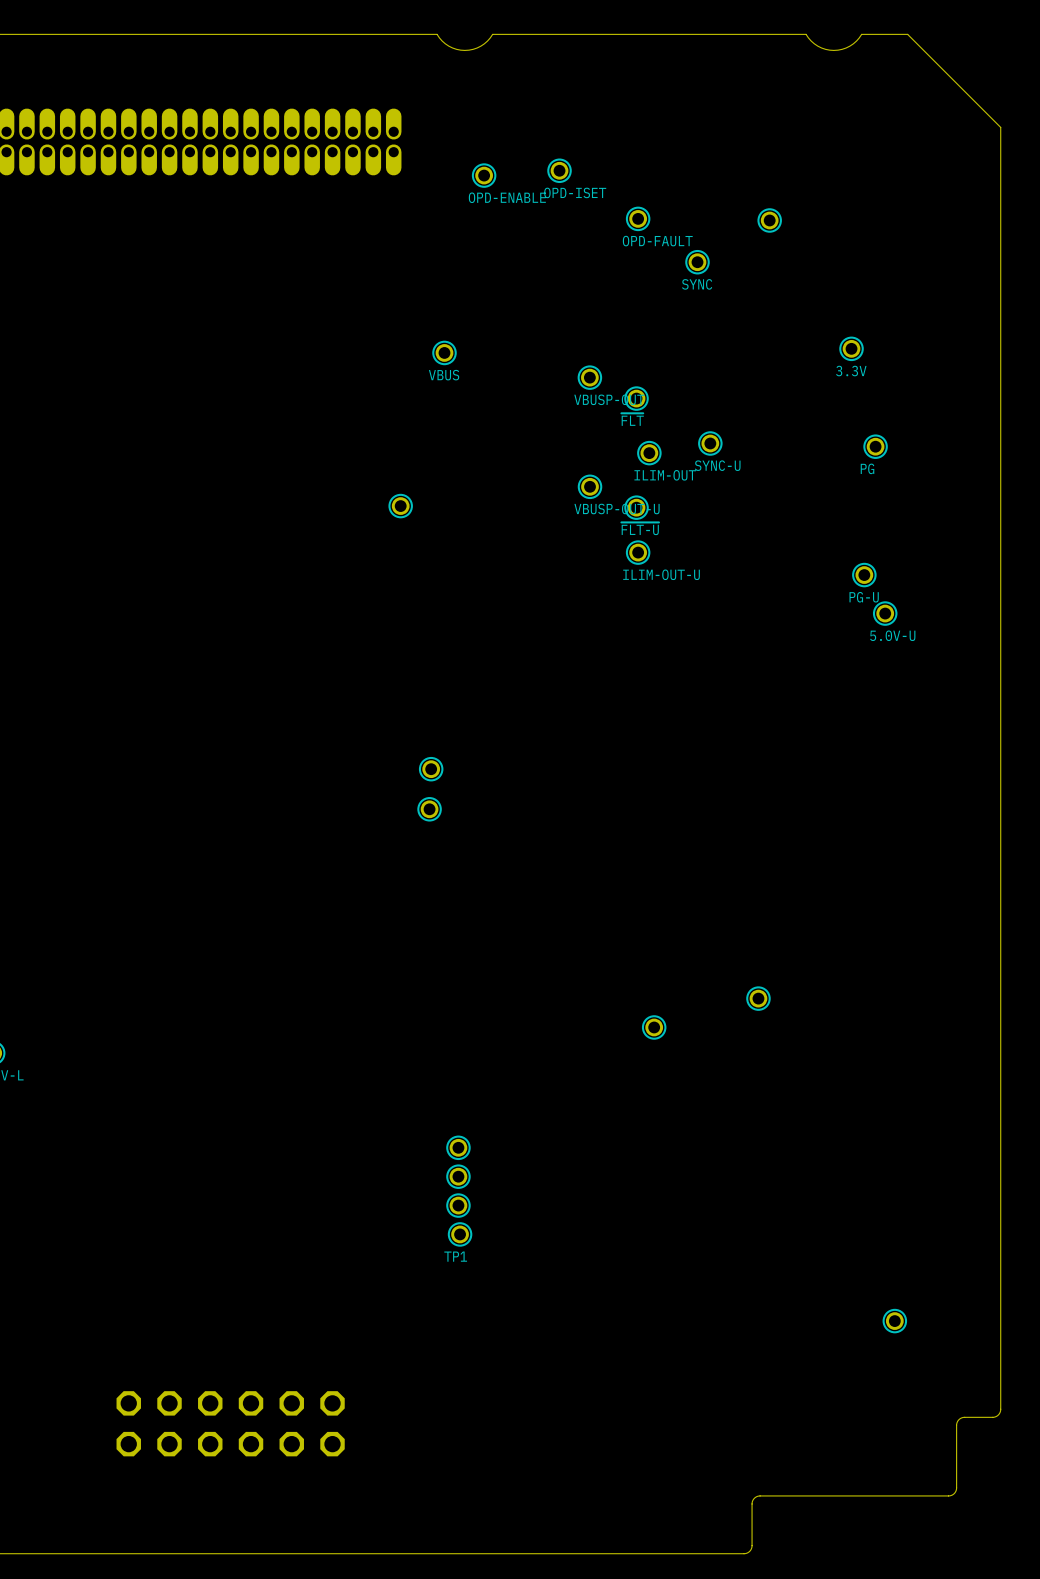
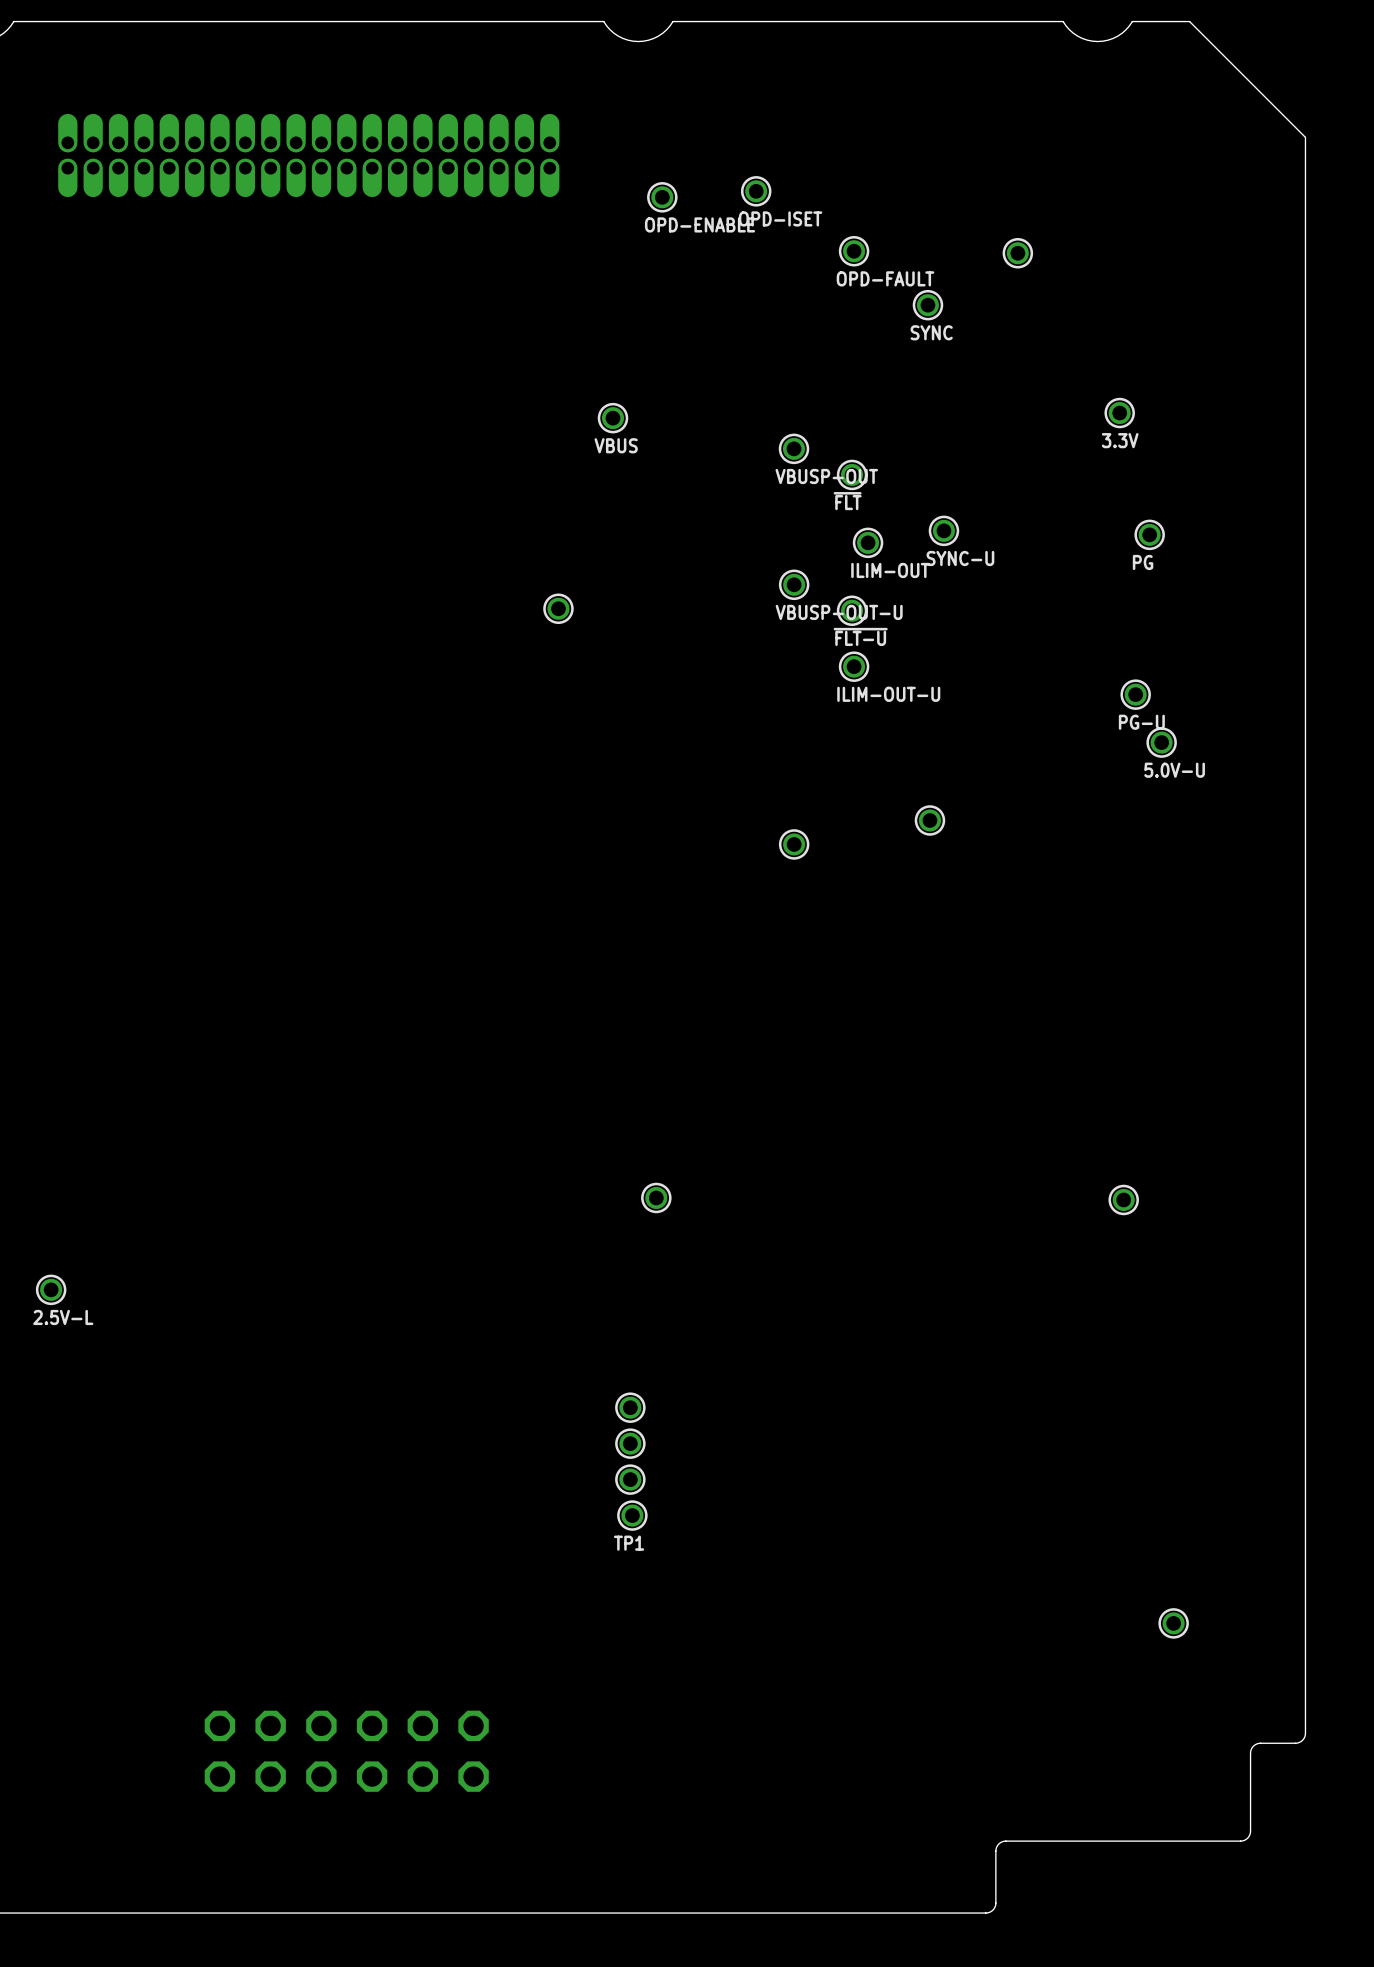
part: none -> (929, 820)
part: none -> (794, 844)
part: (431, 769) -> none
part: (429, 809) -> none
part: none -> (656, 1197)
part position: (758, 998) -> (1123, 1199)
part: (654, 1027) -> none

